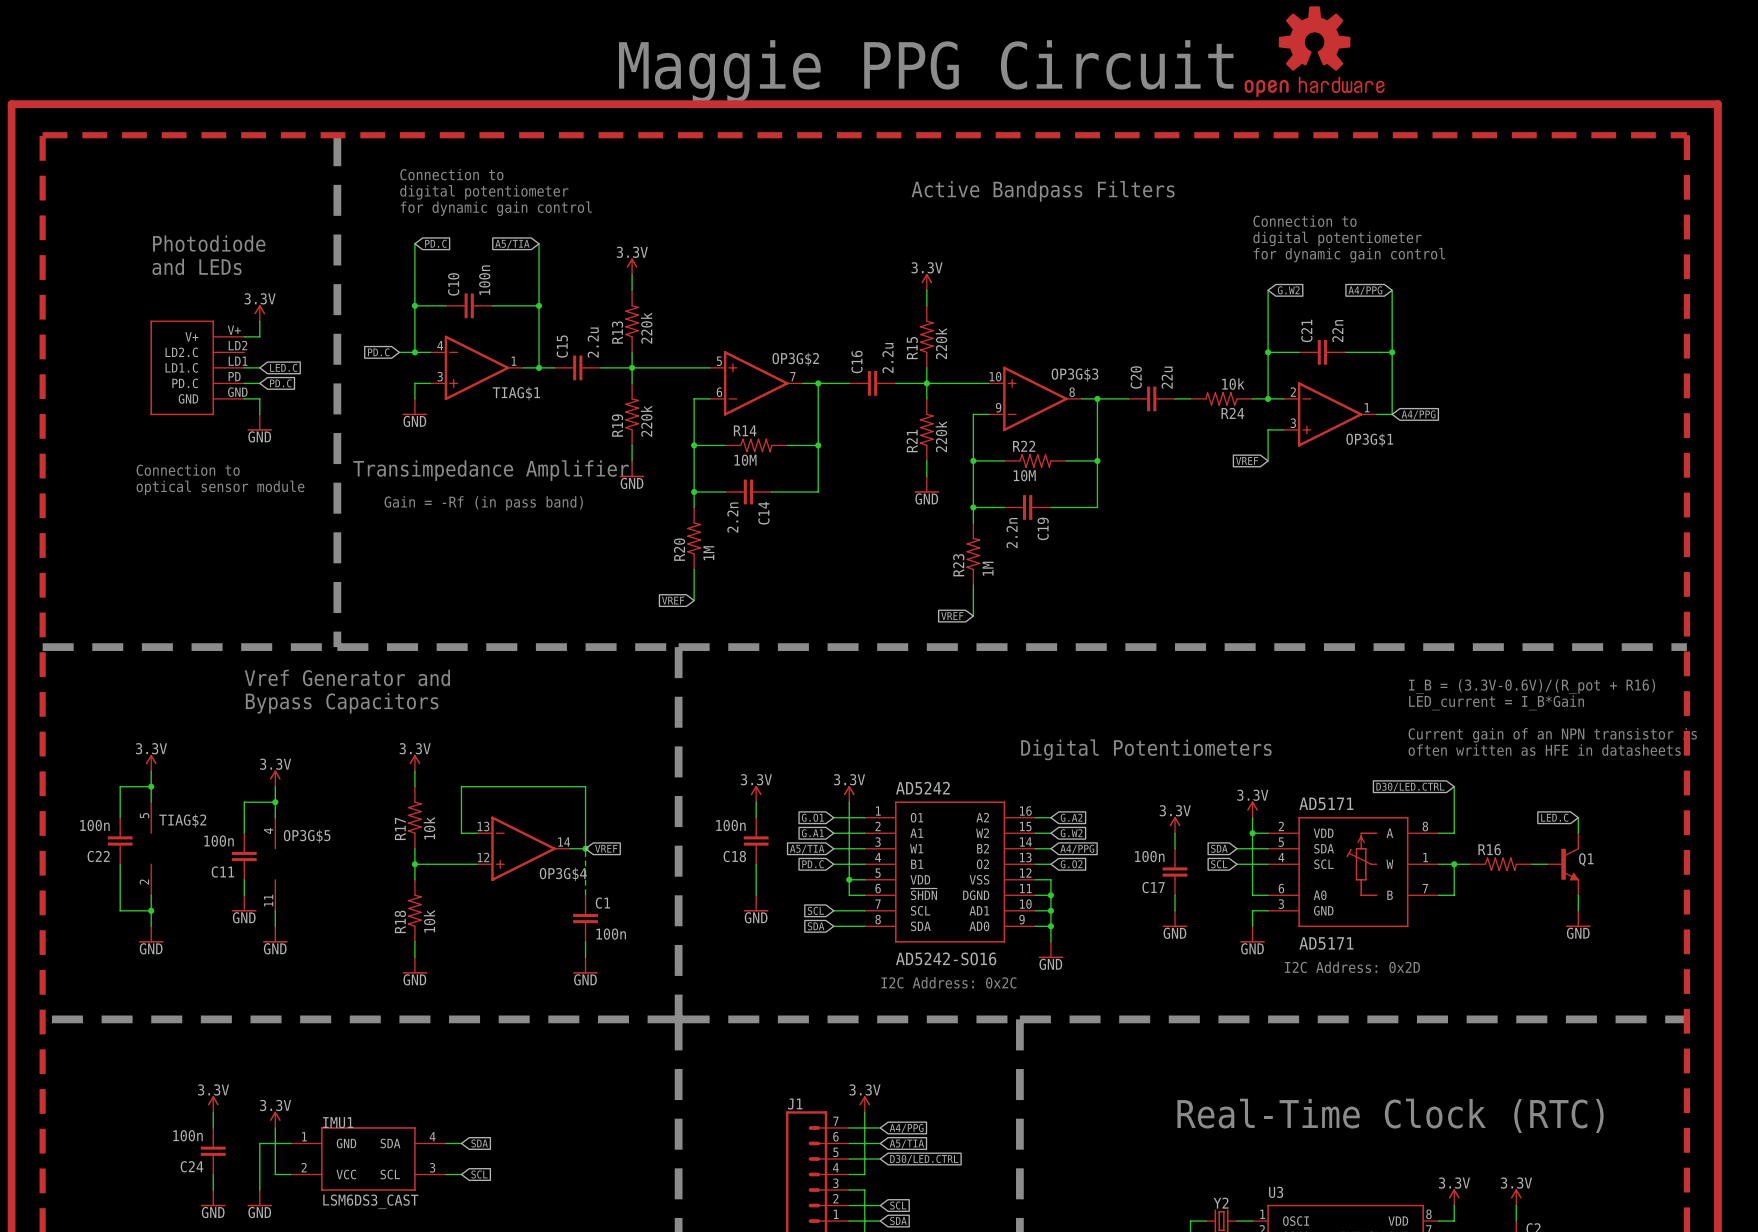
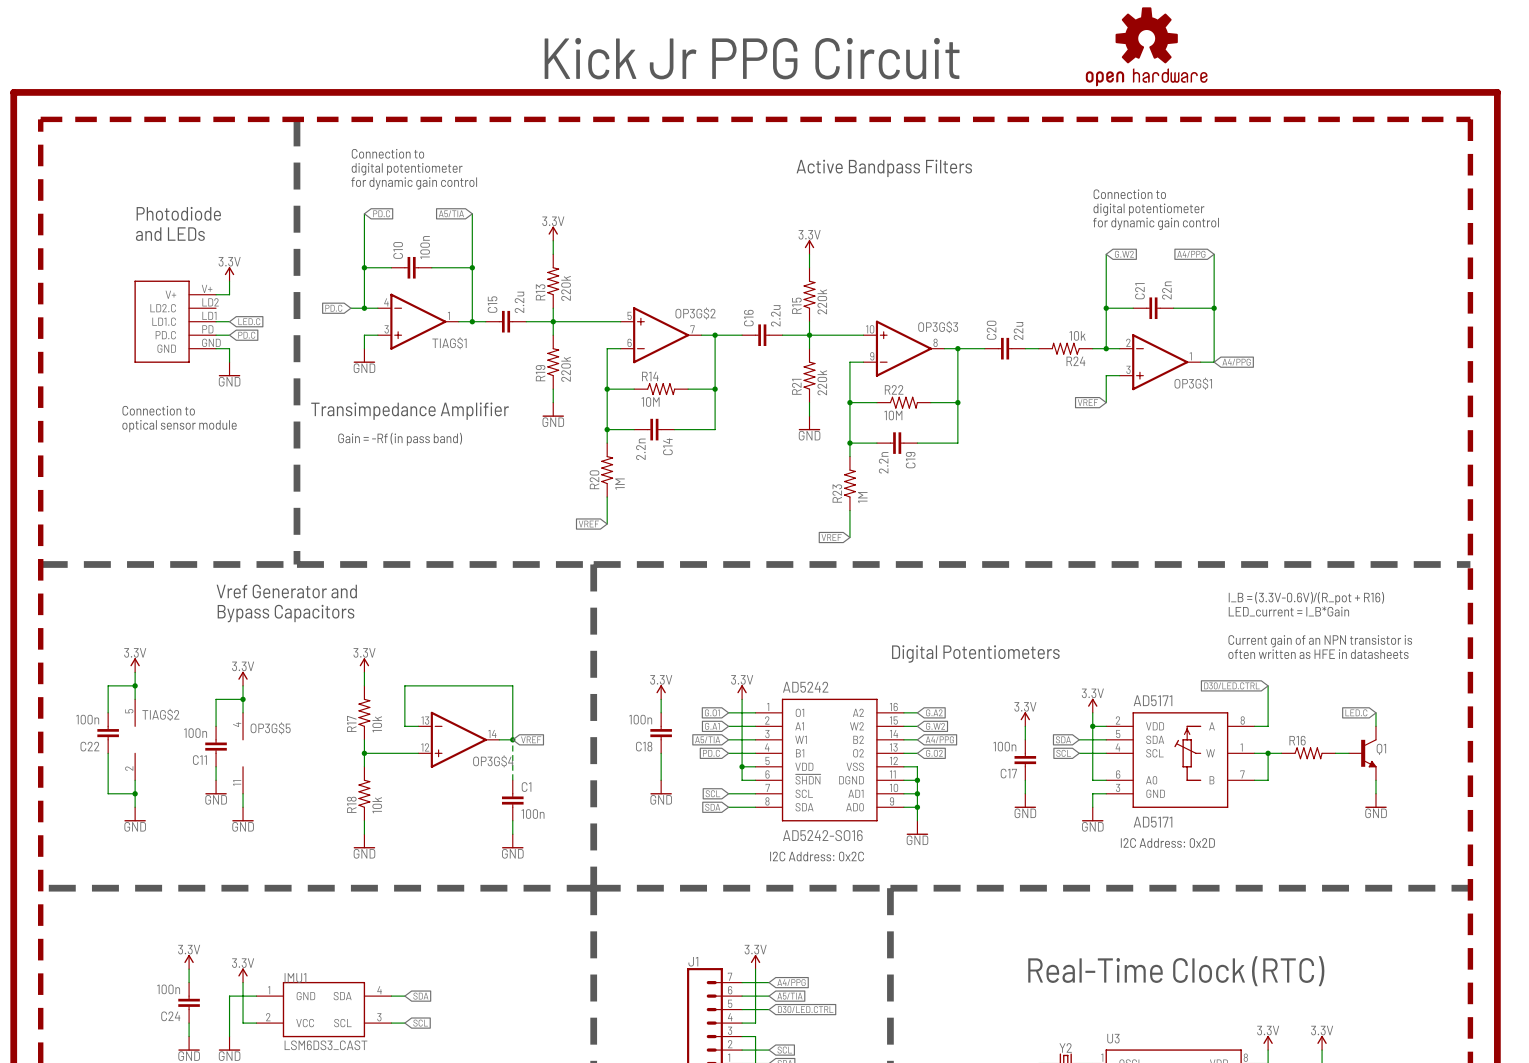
text: Maggie PPG Circuit (926, 71) -> Kick Jr PPG Circuit (752, 58)

